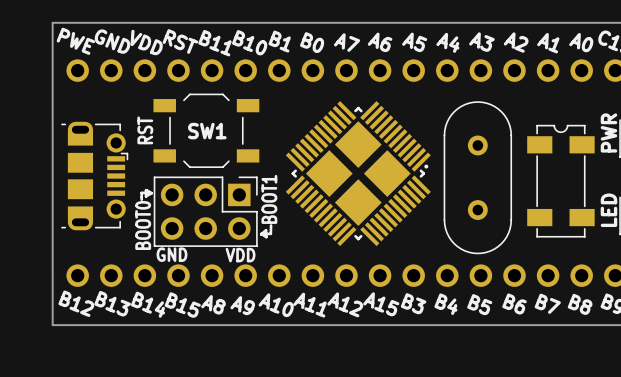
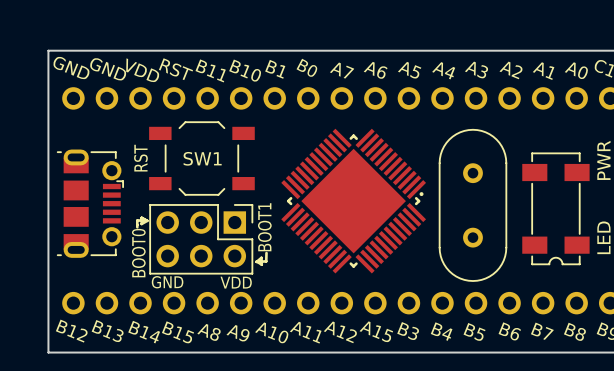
text: PWE (75, 41) -> GND (71, 67)
text rotation: 0° (312, 42) -> 6° clockwise (306, 68)
part footprint: [285, 101, 431, 247] -> [281, 128, 427, 274]
part rotation: 0° (560, 181) -> 180° (555, 208)

